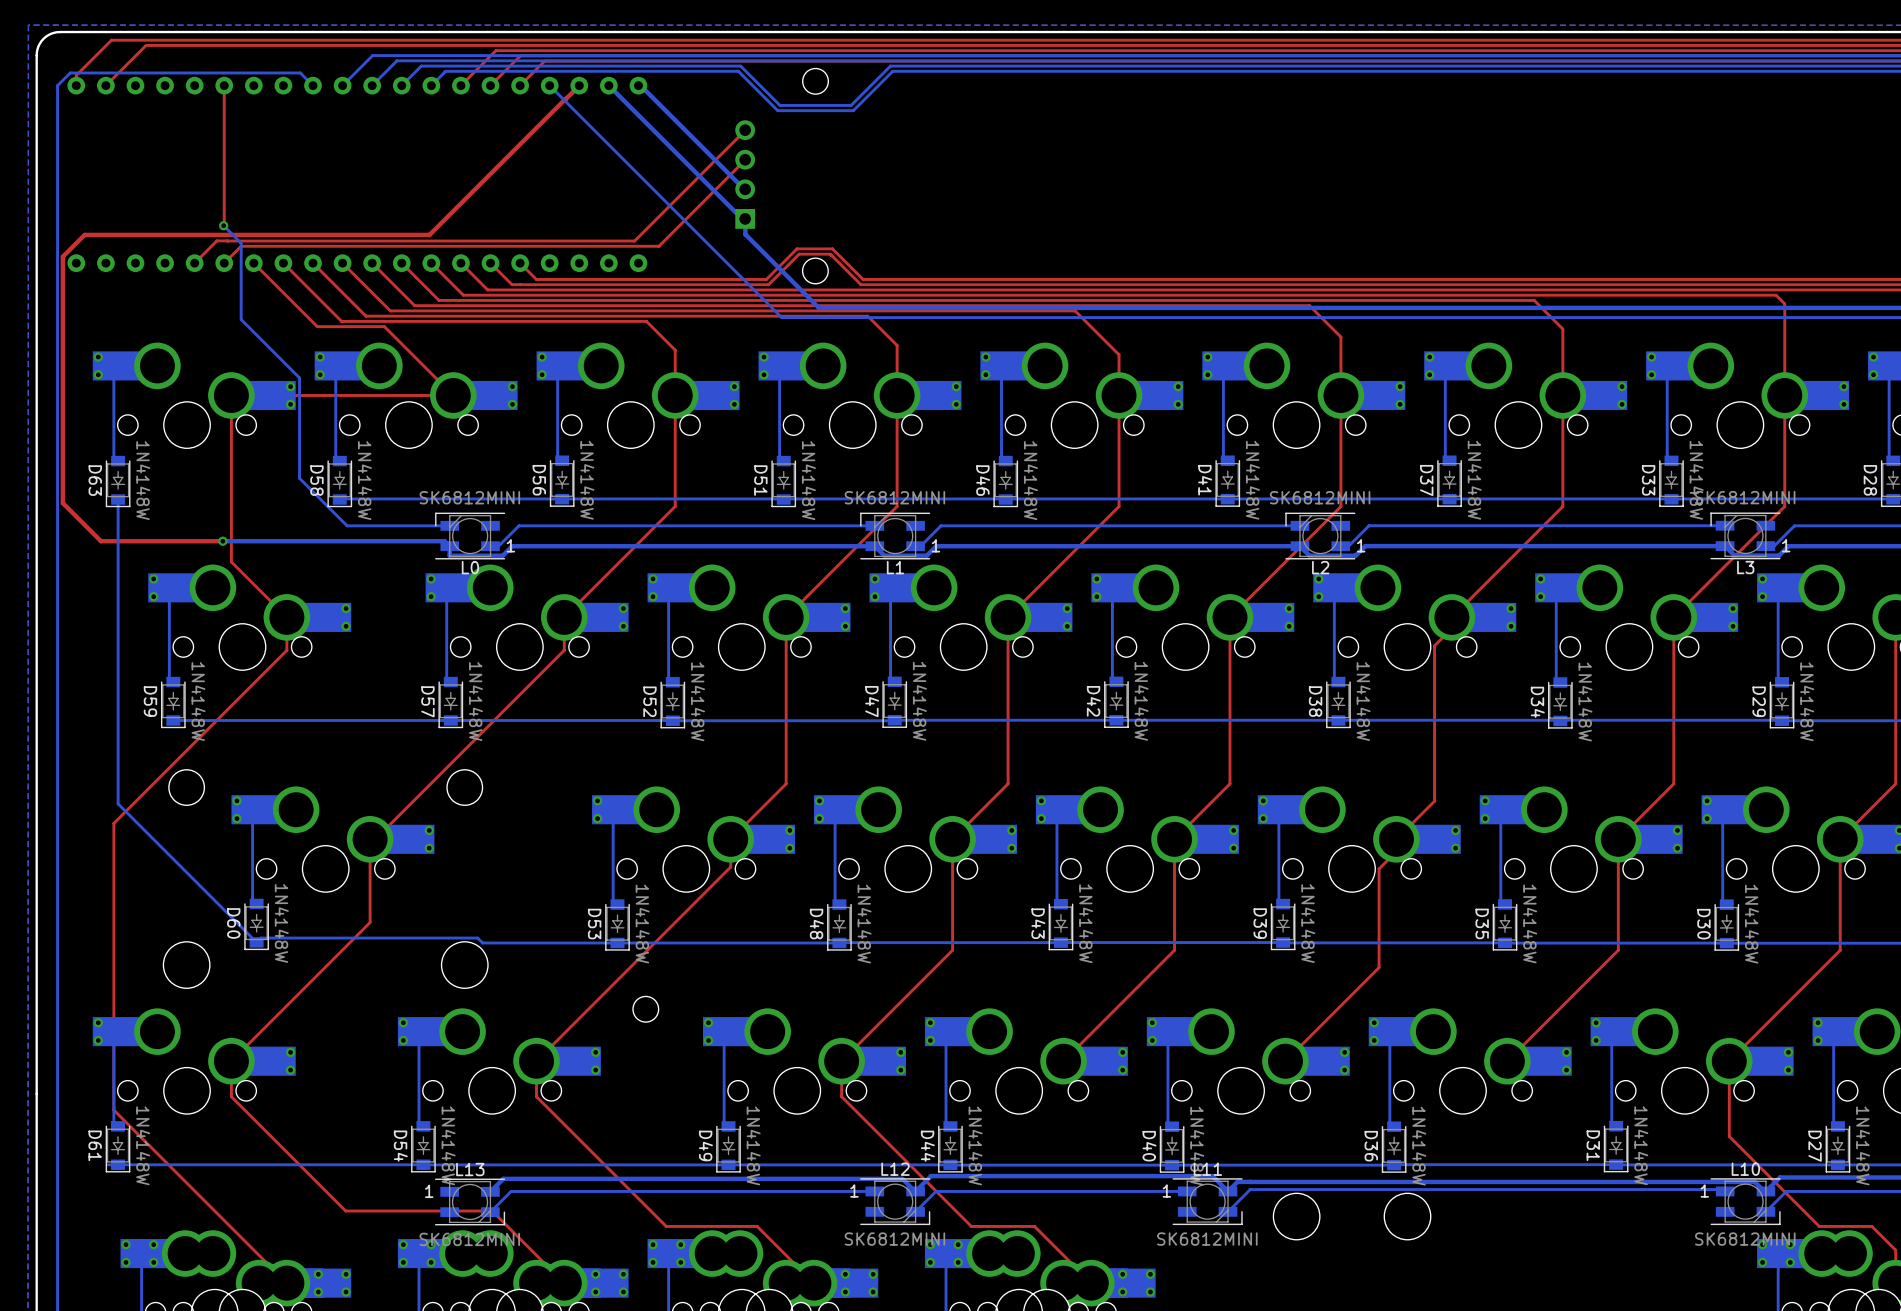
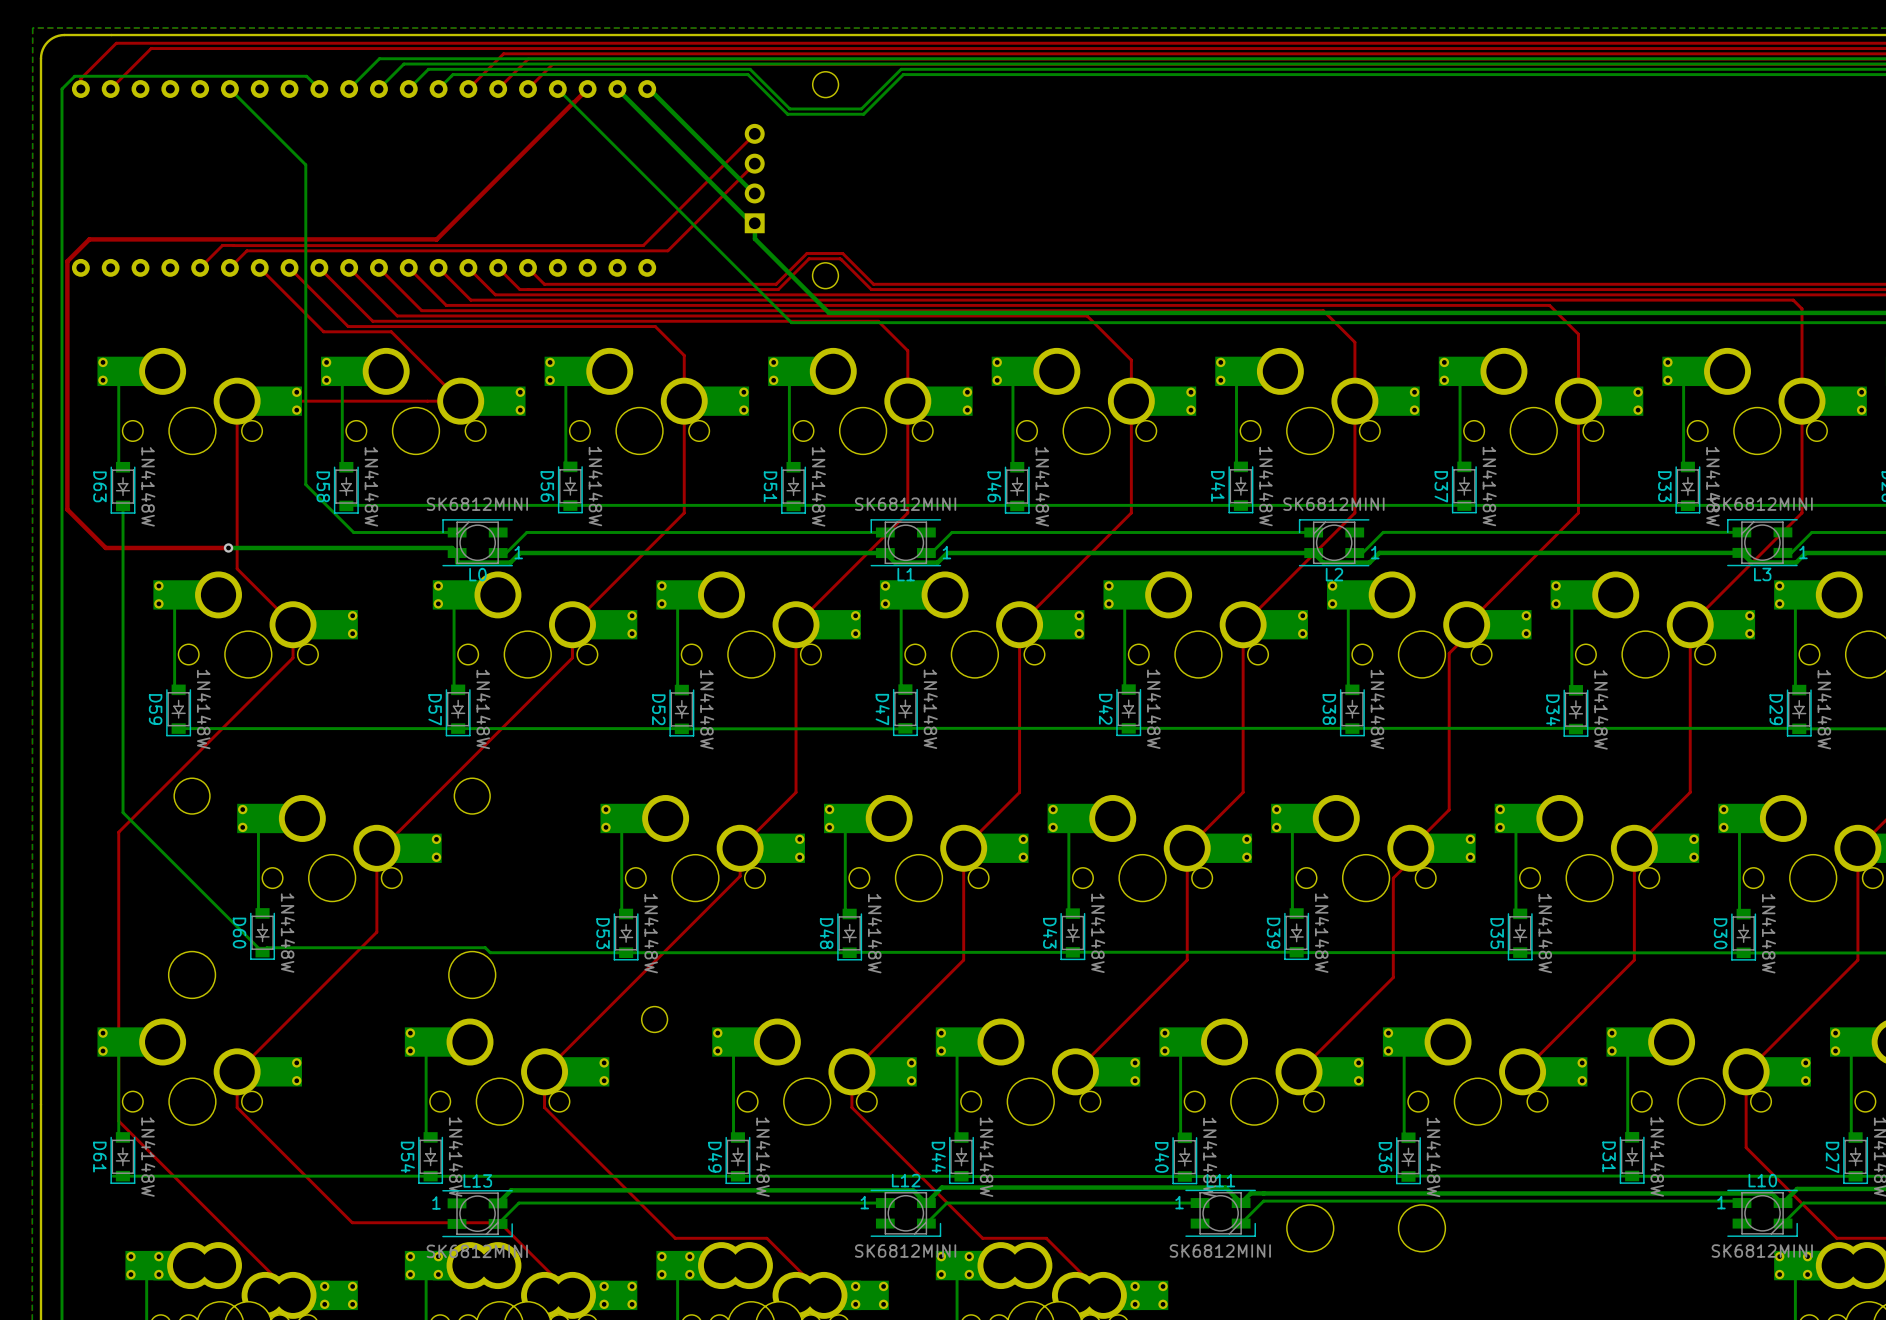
top track: (224, 85) (223, 225) -> none
bottom track: (223, 225) (241, 243) (241, 319) (299, 377) -> (229, 89) (305, 164) (305, 383)
via: (223, 225) -> none

